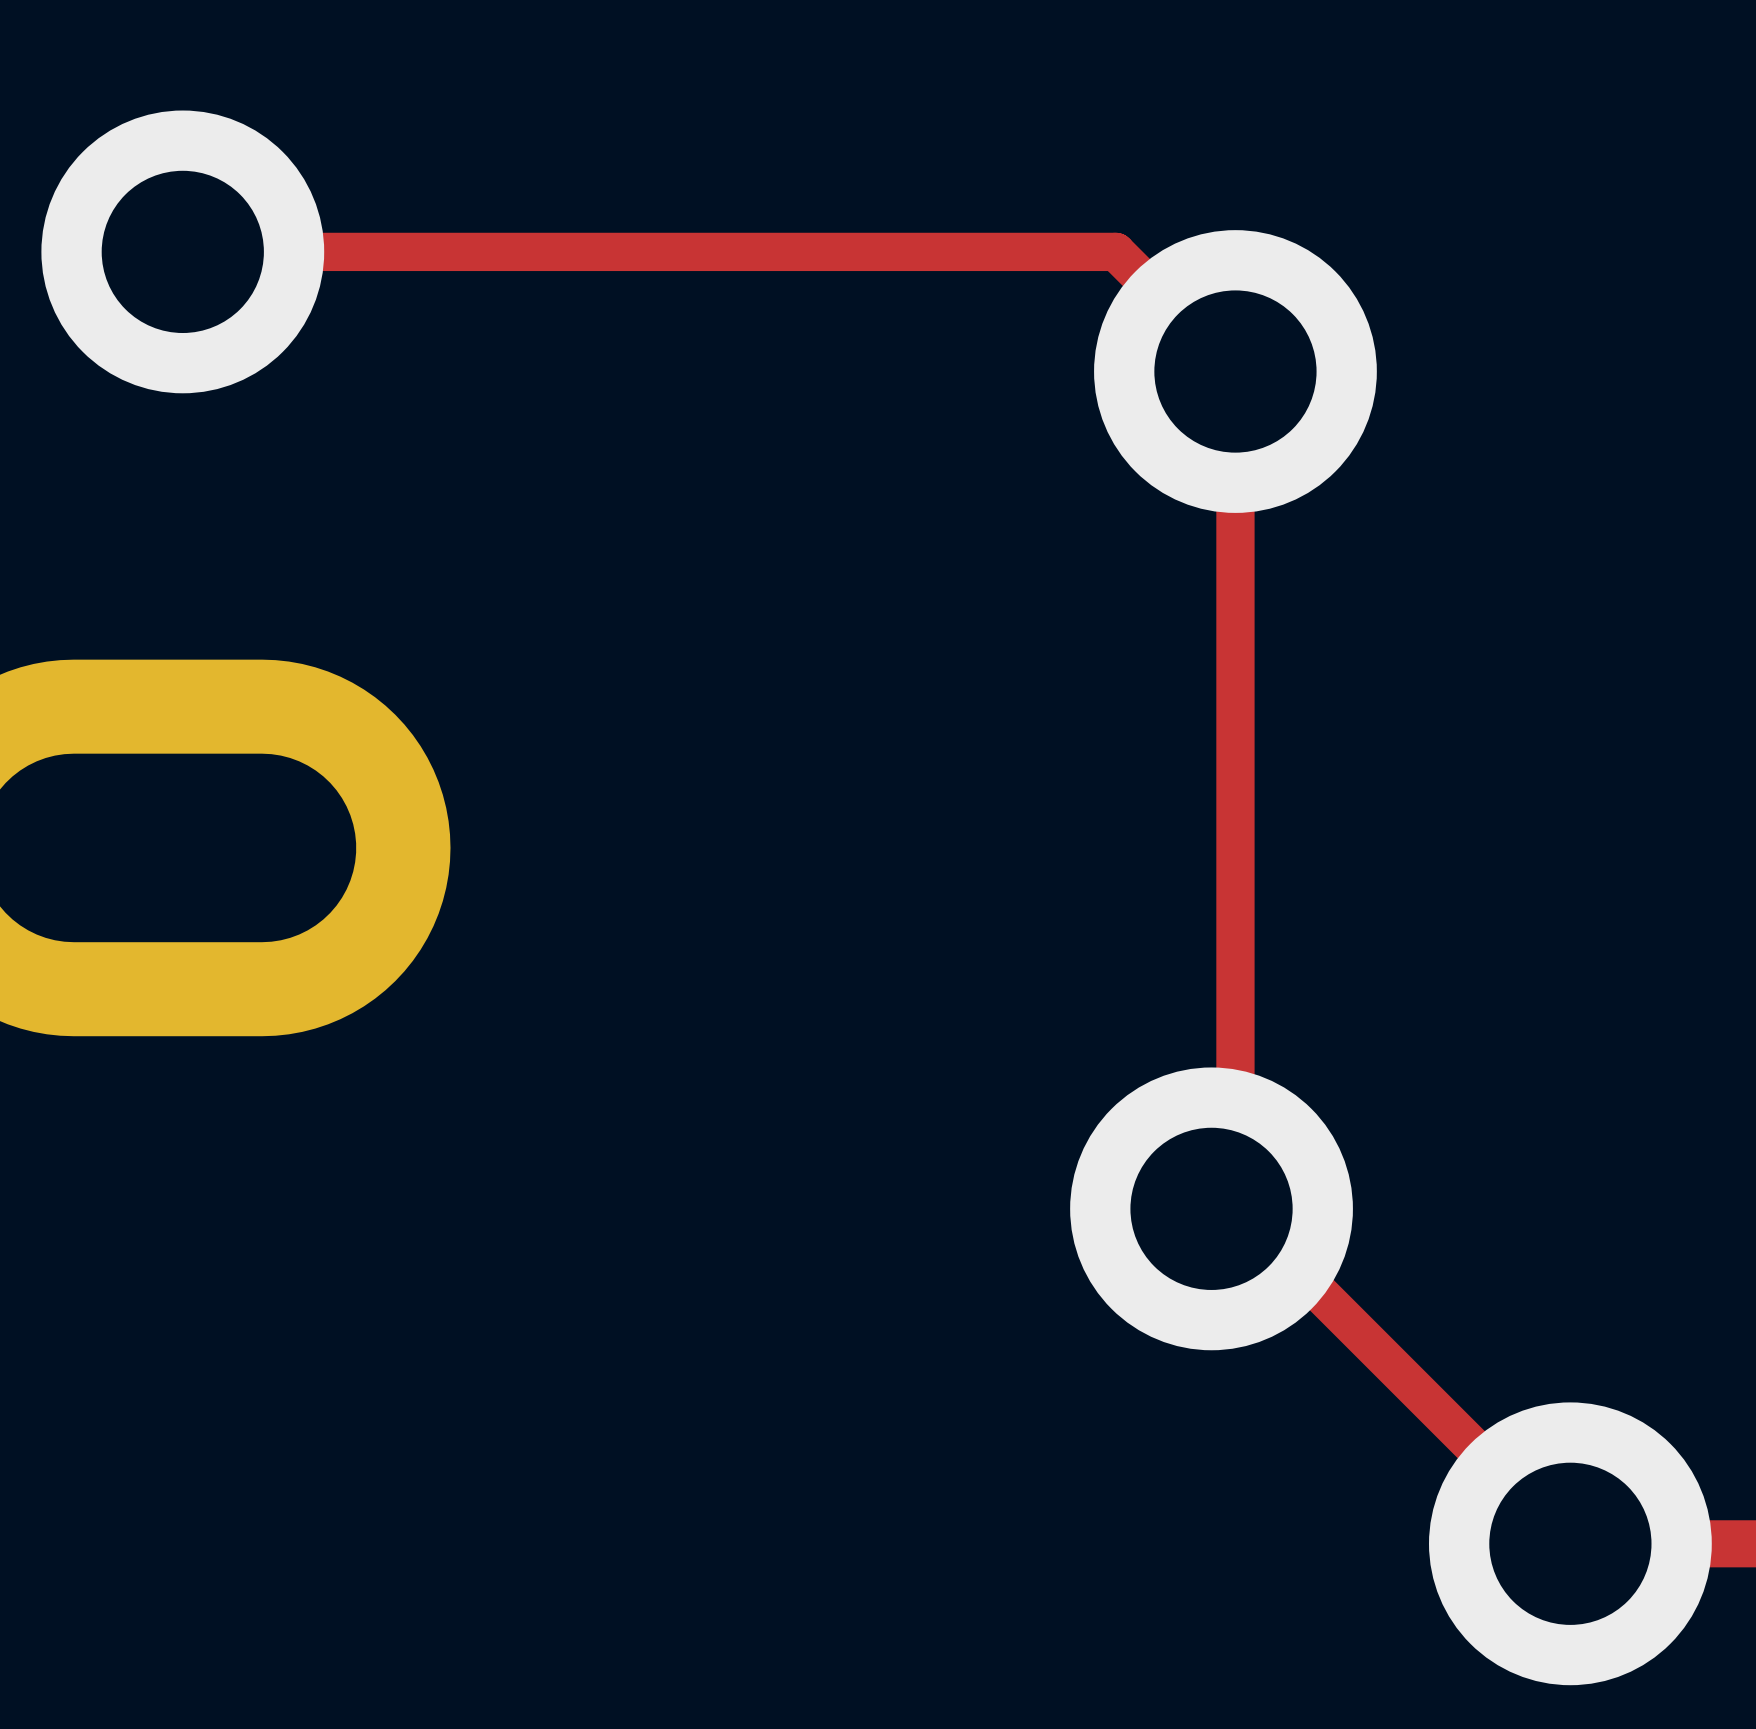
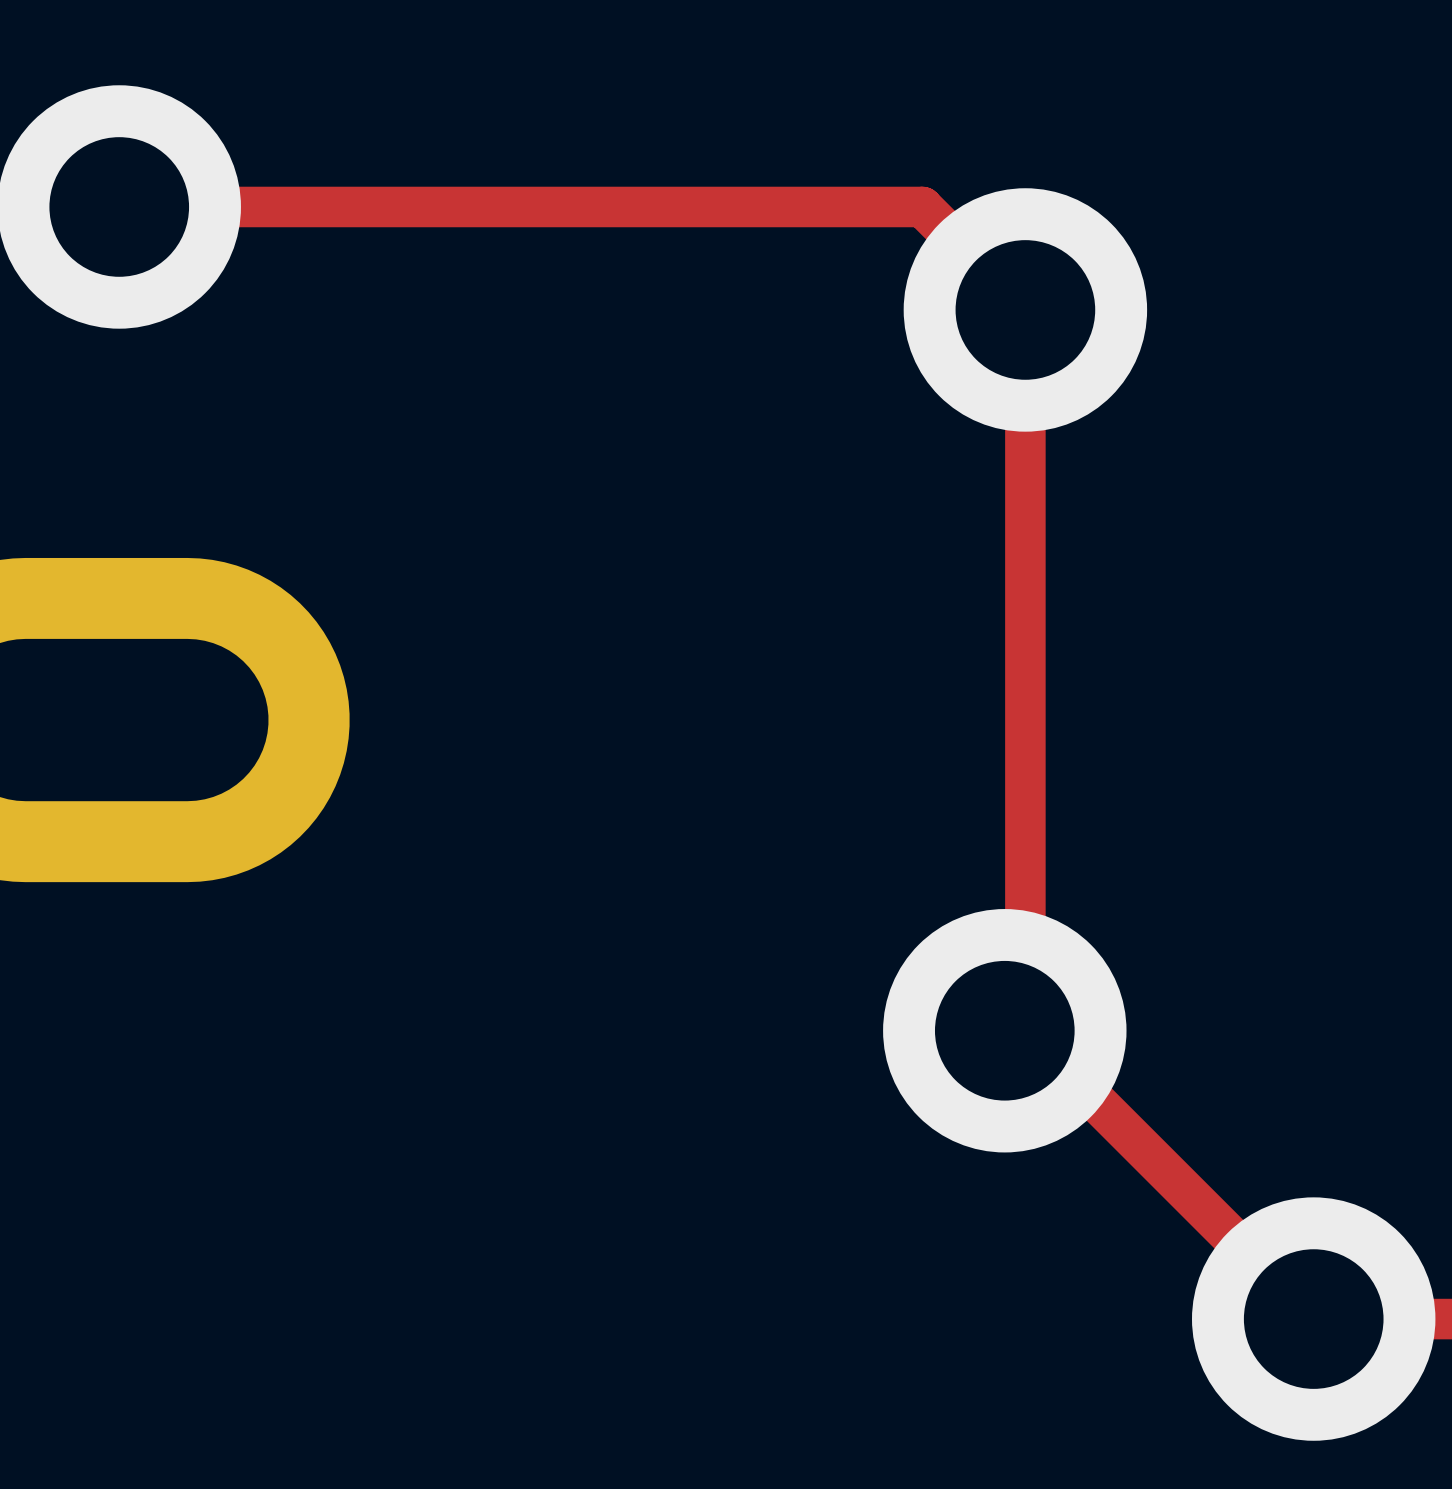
track width: thin (182, 251) (1115, 251) (1235, 371) (1235, 1184) -> thick (119, 206) (922, 206) (1025, 309) (1025, 1010)
track width: thin (1235, 1208) (1570, 1543) -> thick (1025, 1030) (1313, 1319)

